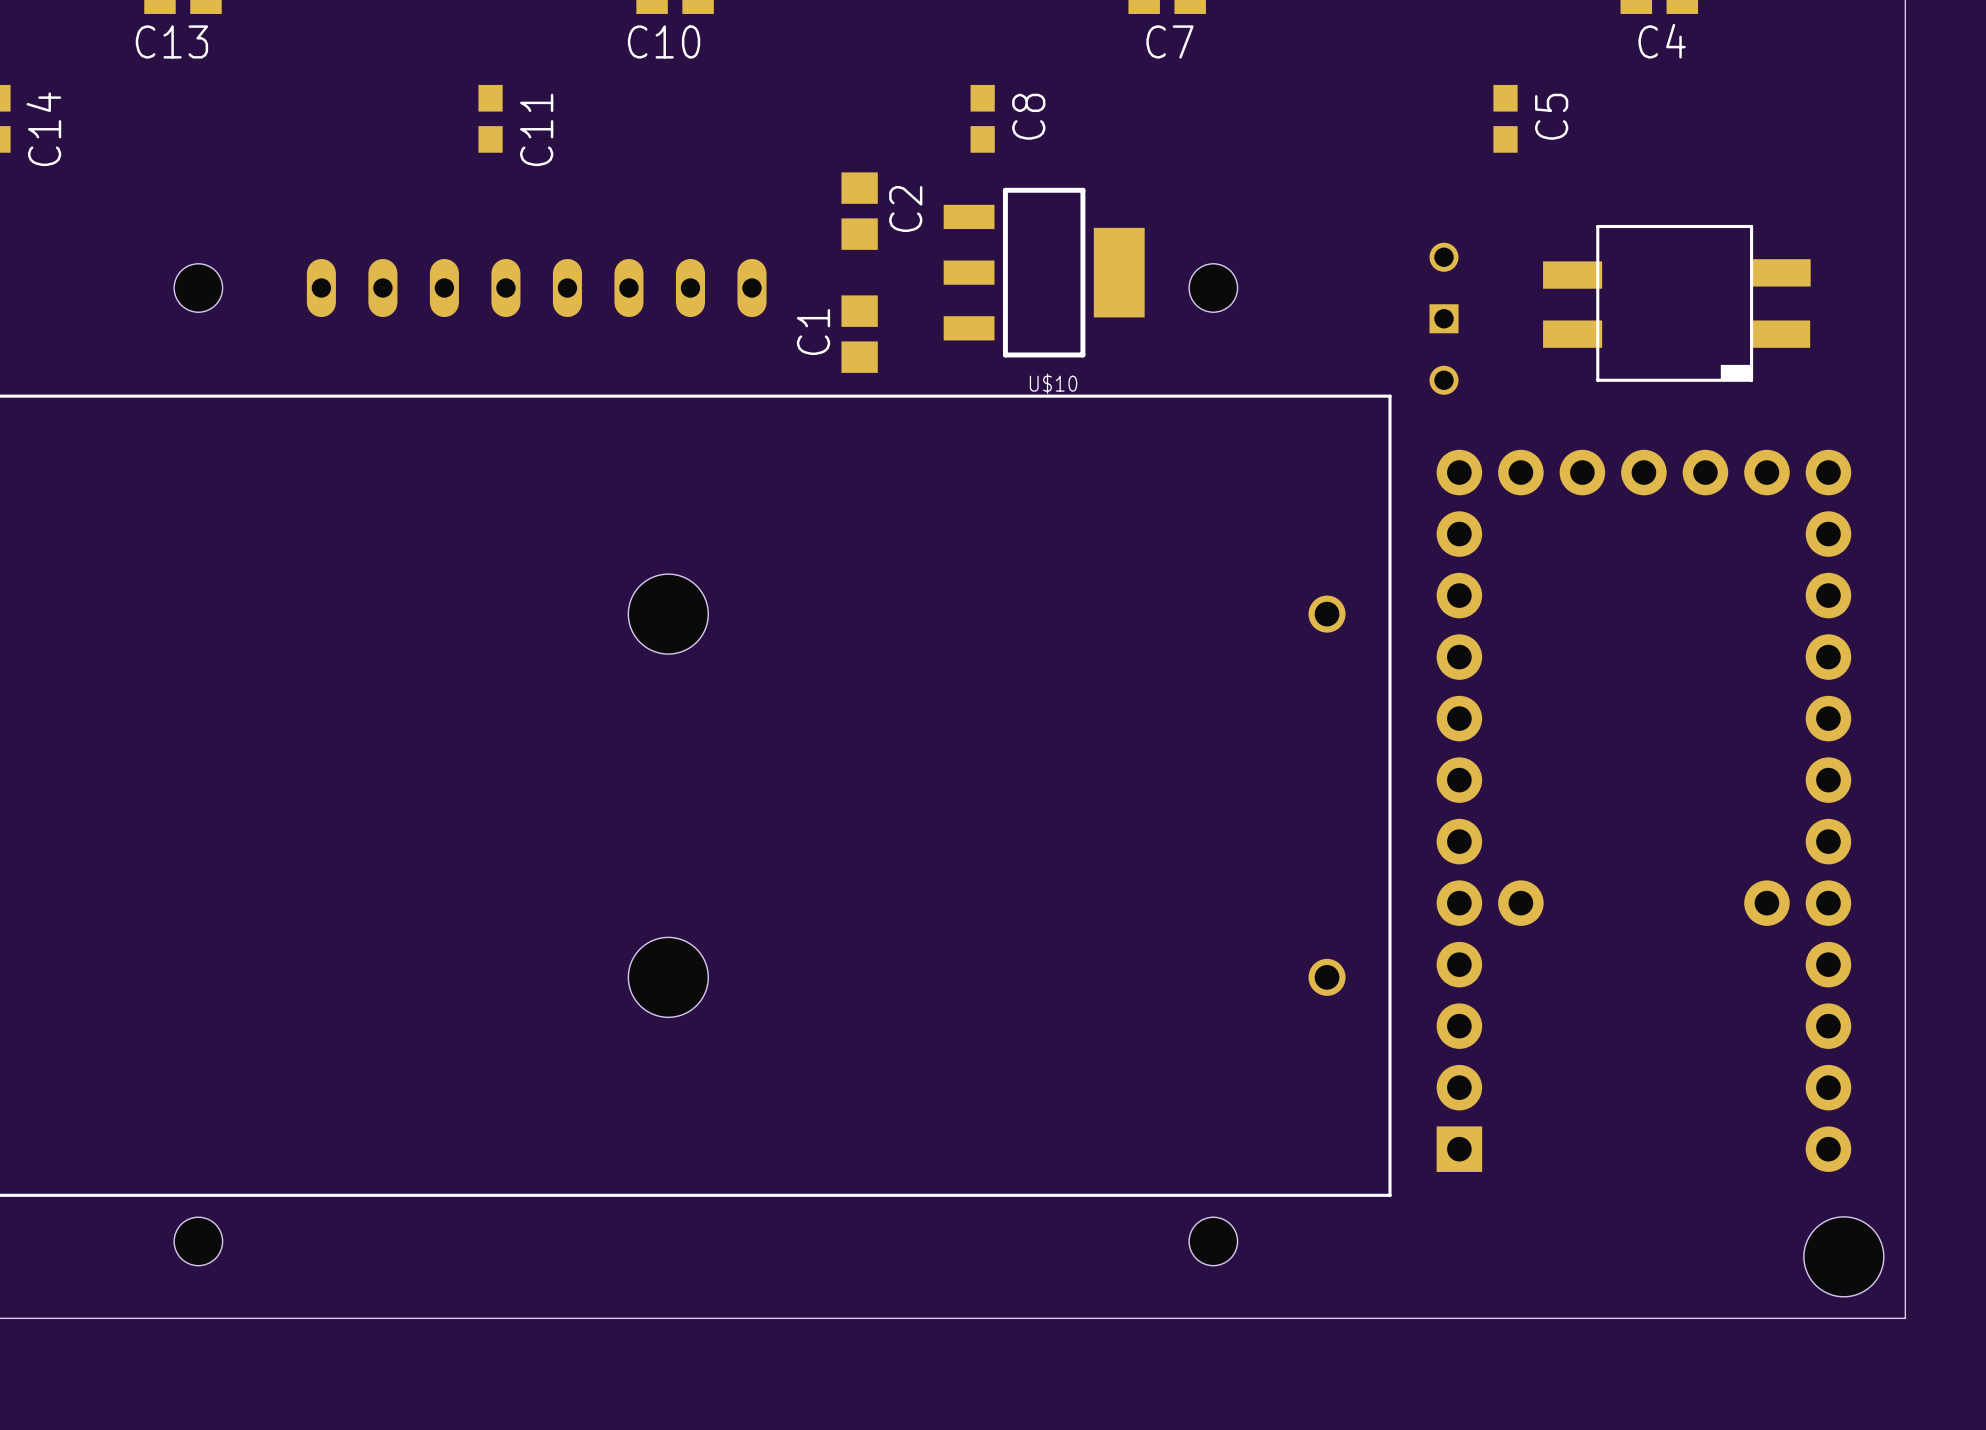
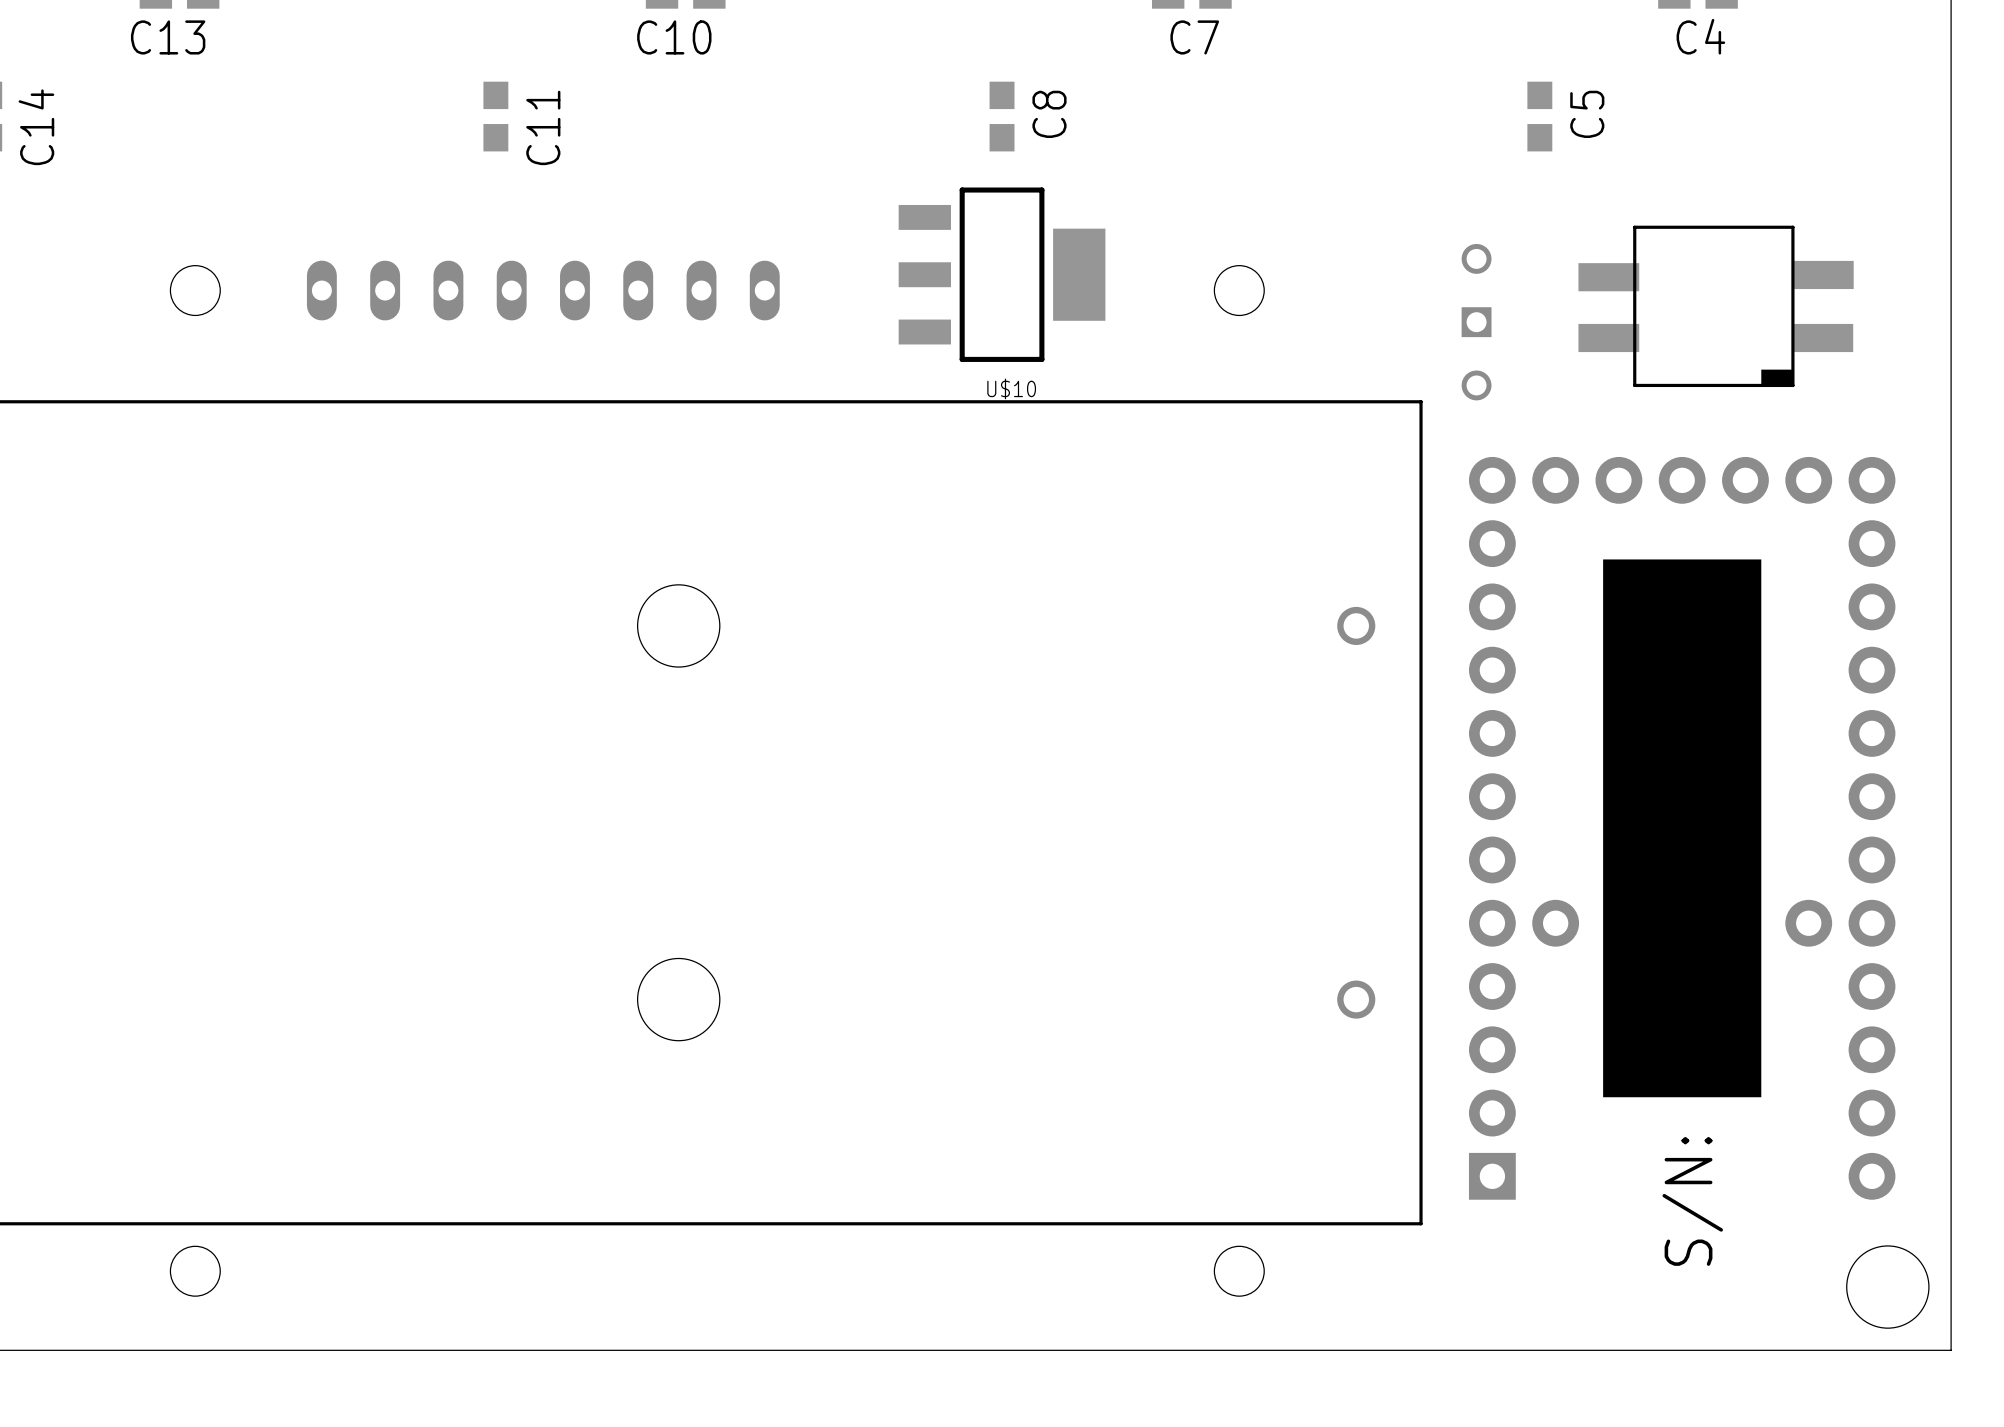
C2: (859, 211) -> none
U$10 position: (1044, 272) -> (1002, 274)
C1: (859, 334) -> none
drawing: none -> [1603, 559, 1762, 1098]
text: none -> S/N: (1692, 1201)

